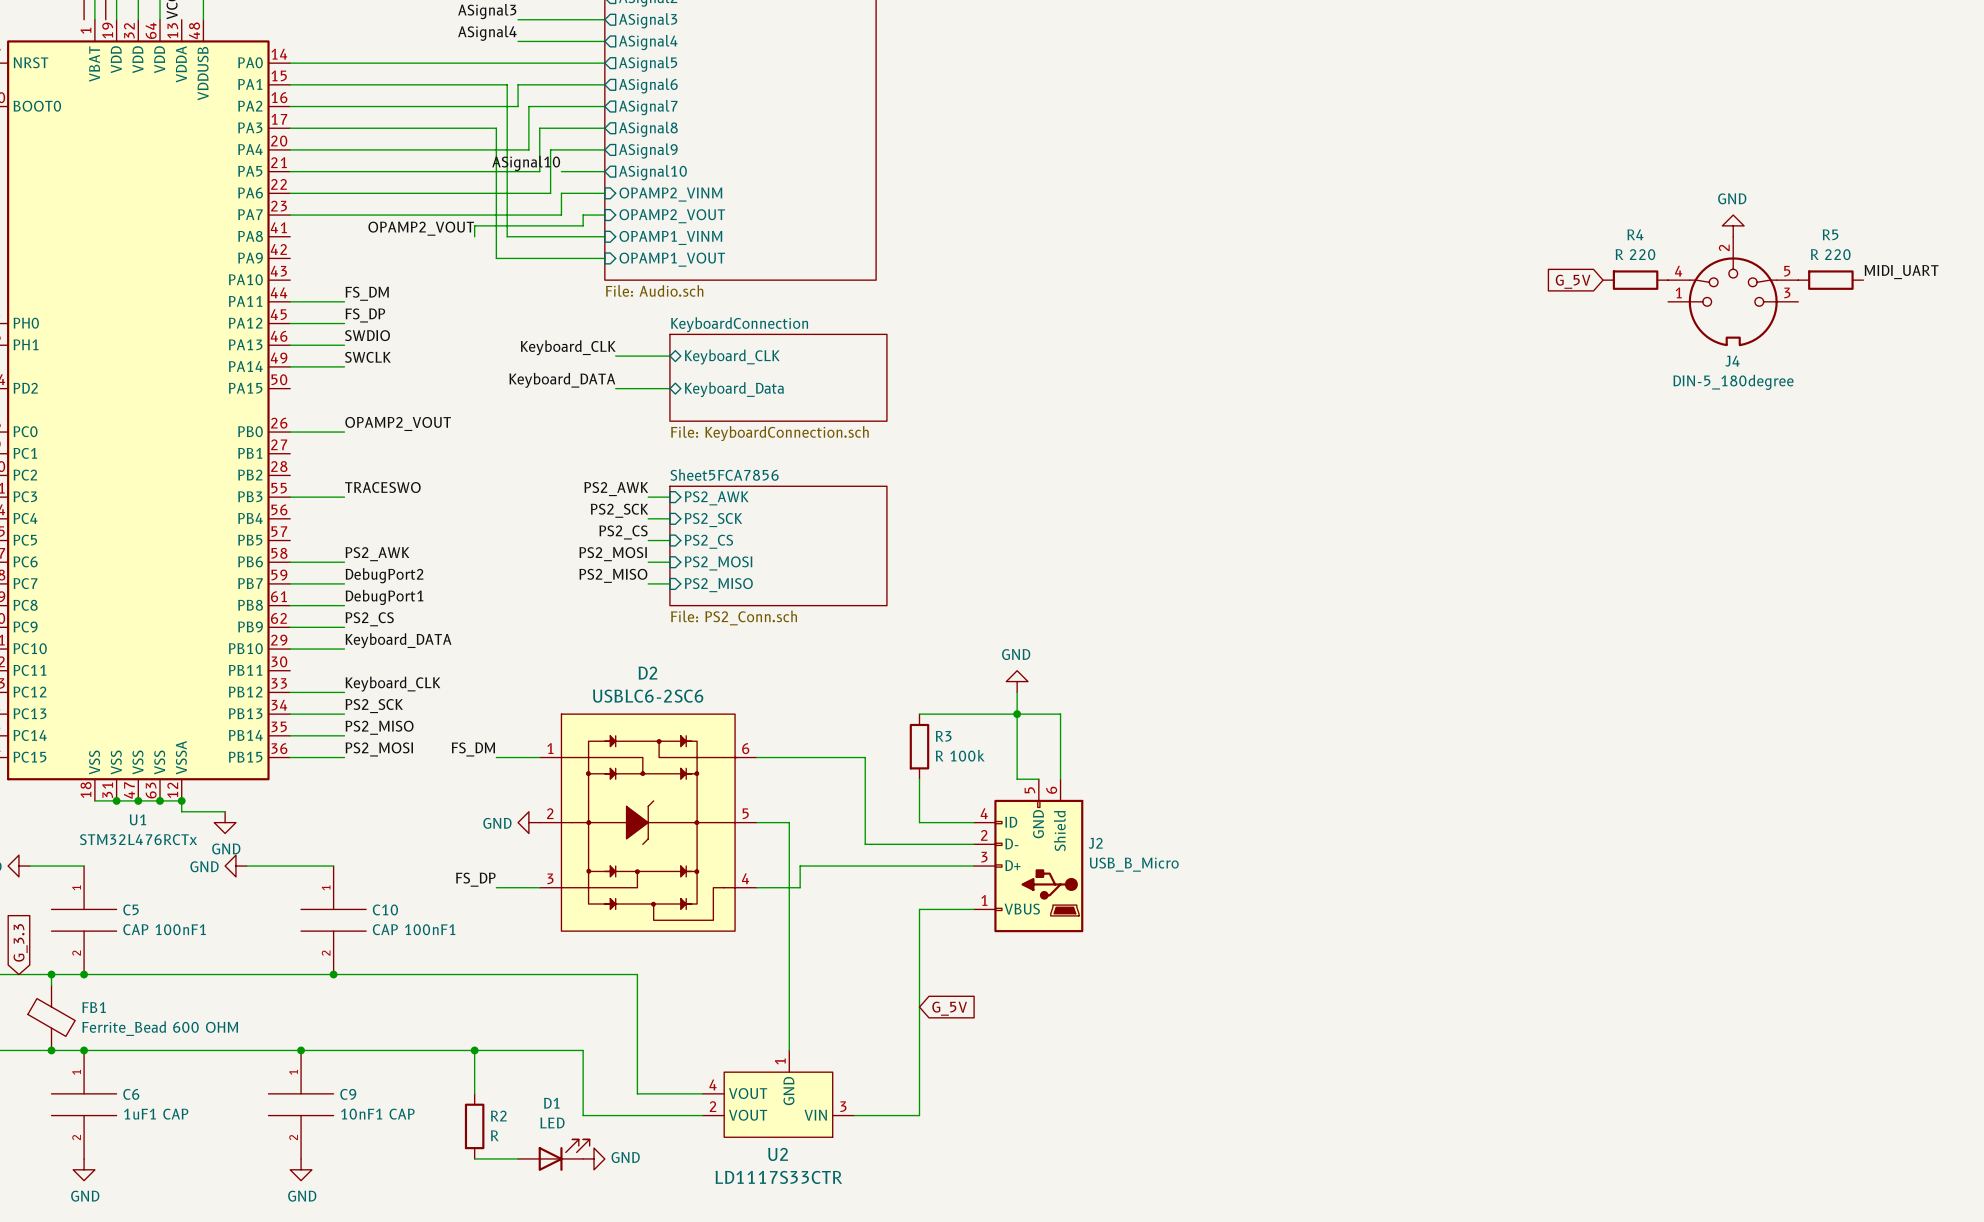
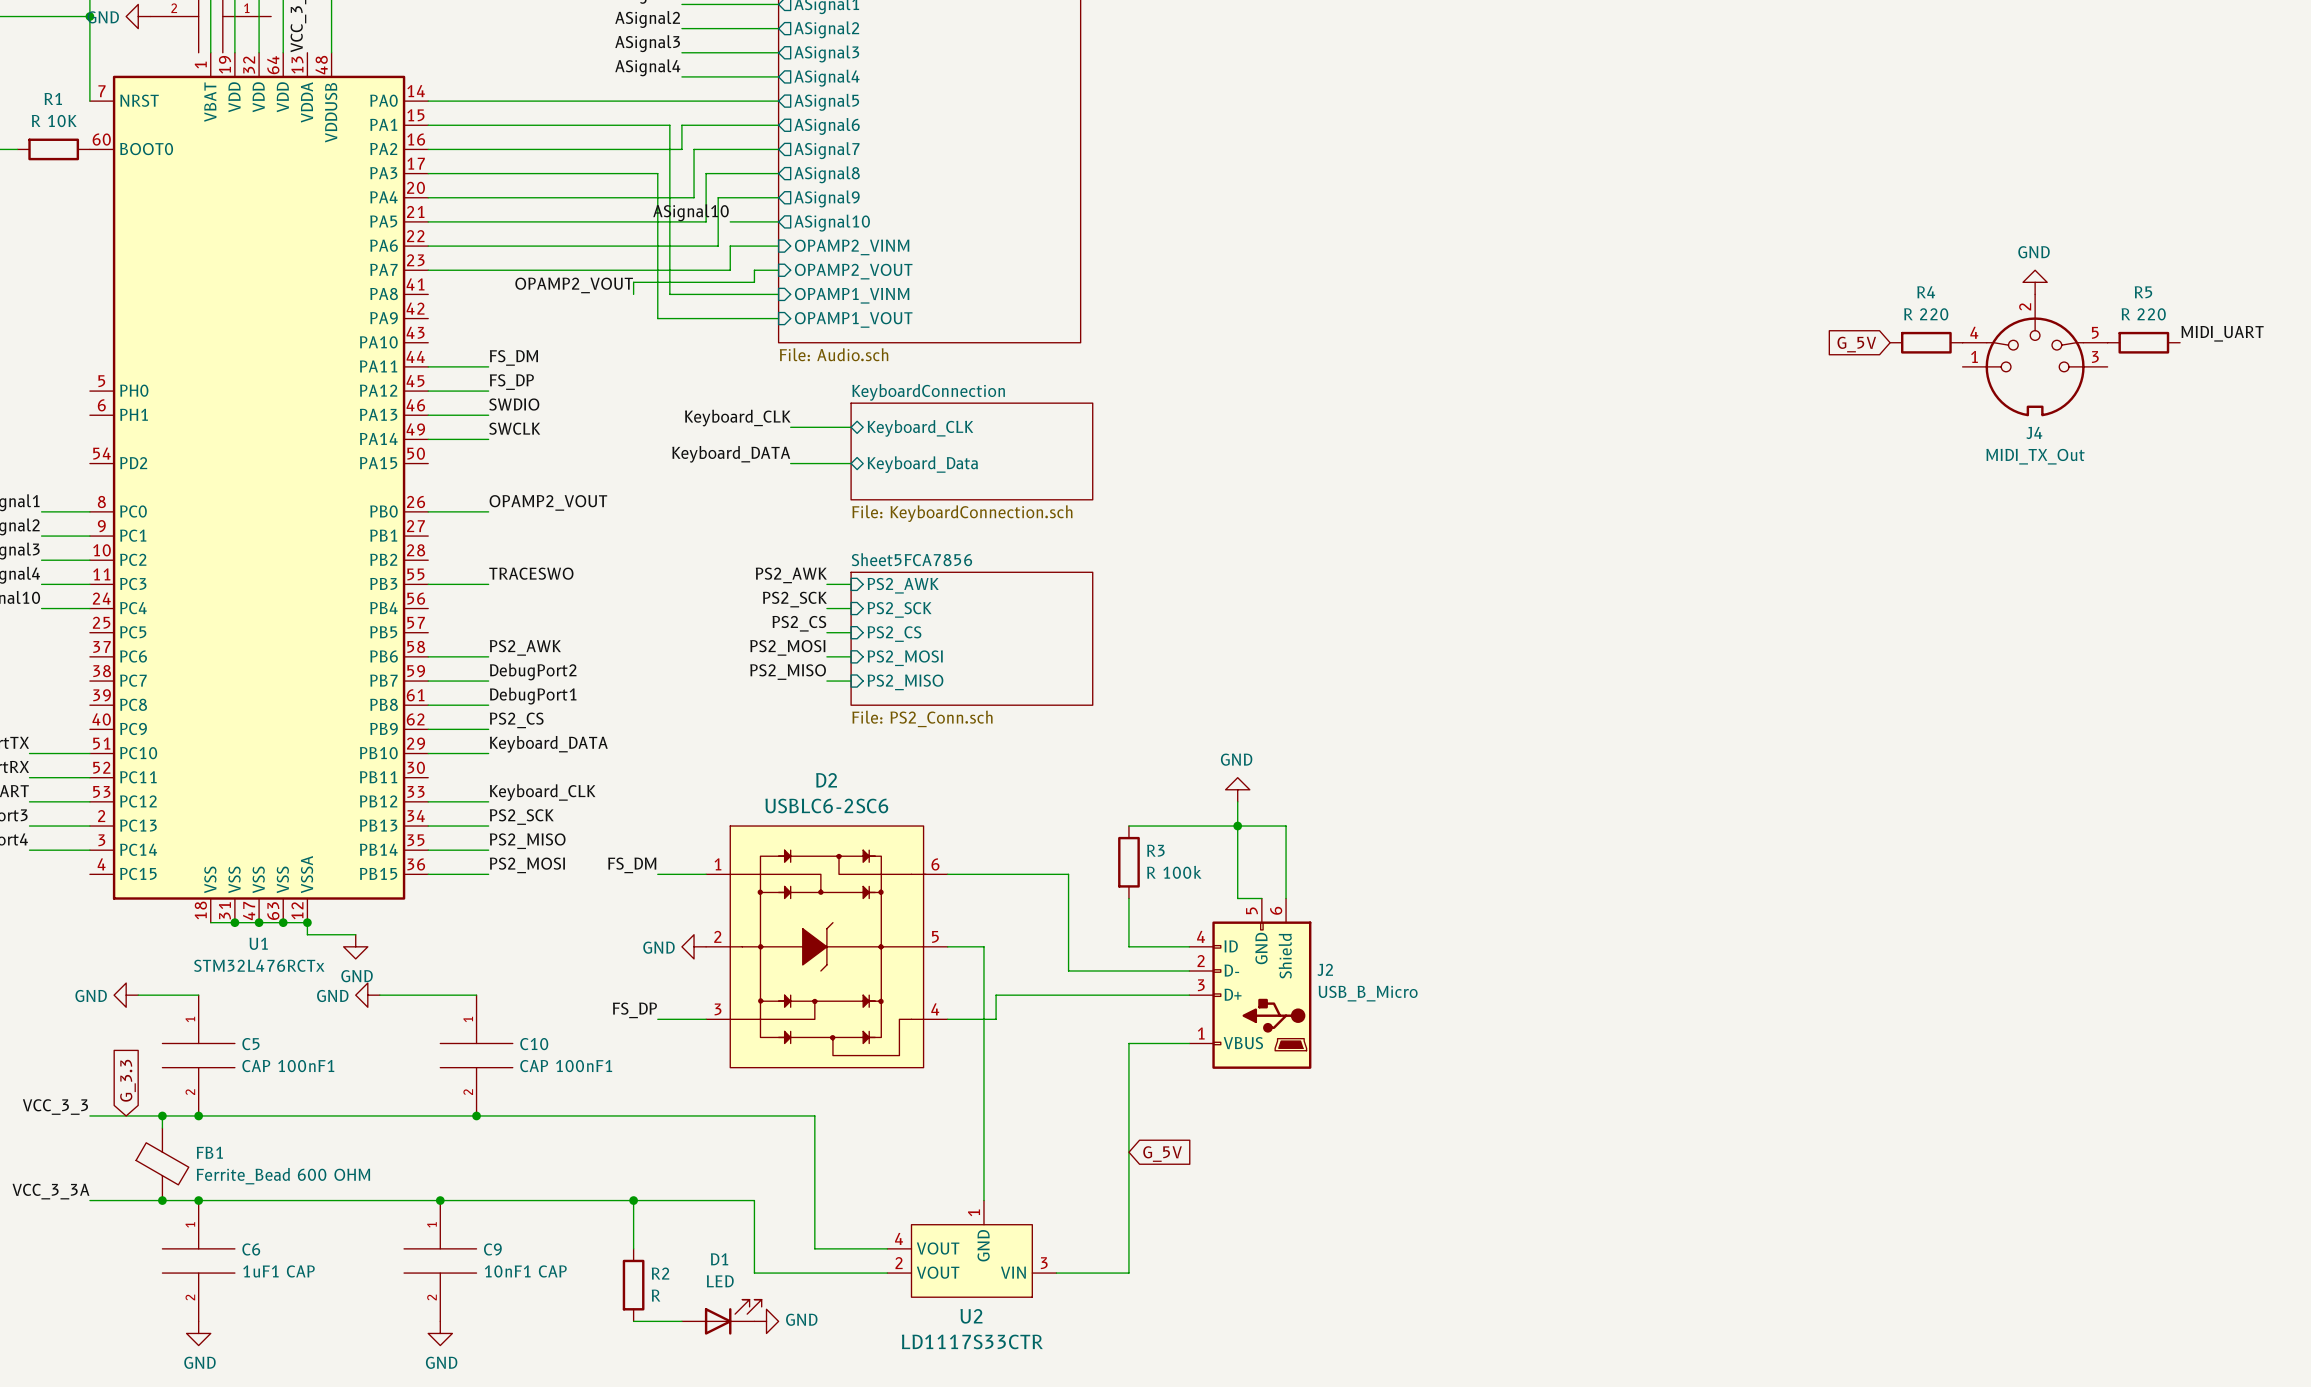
J4 value: DIN-5_180degree (1733, 382) -> MIDI_TX_Out (2035, 456)

